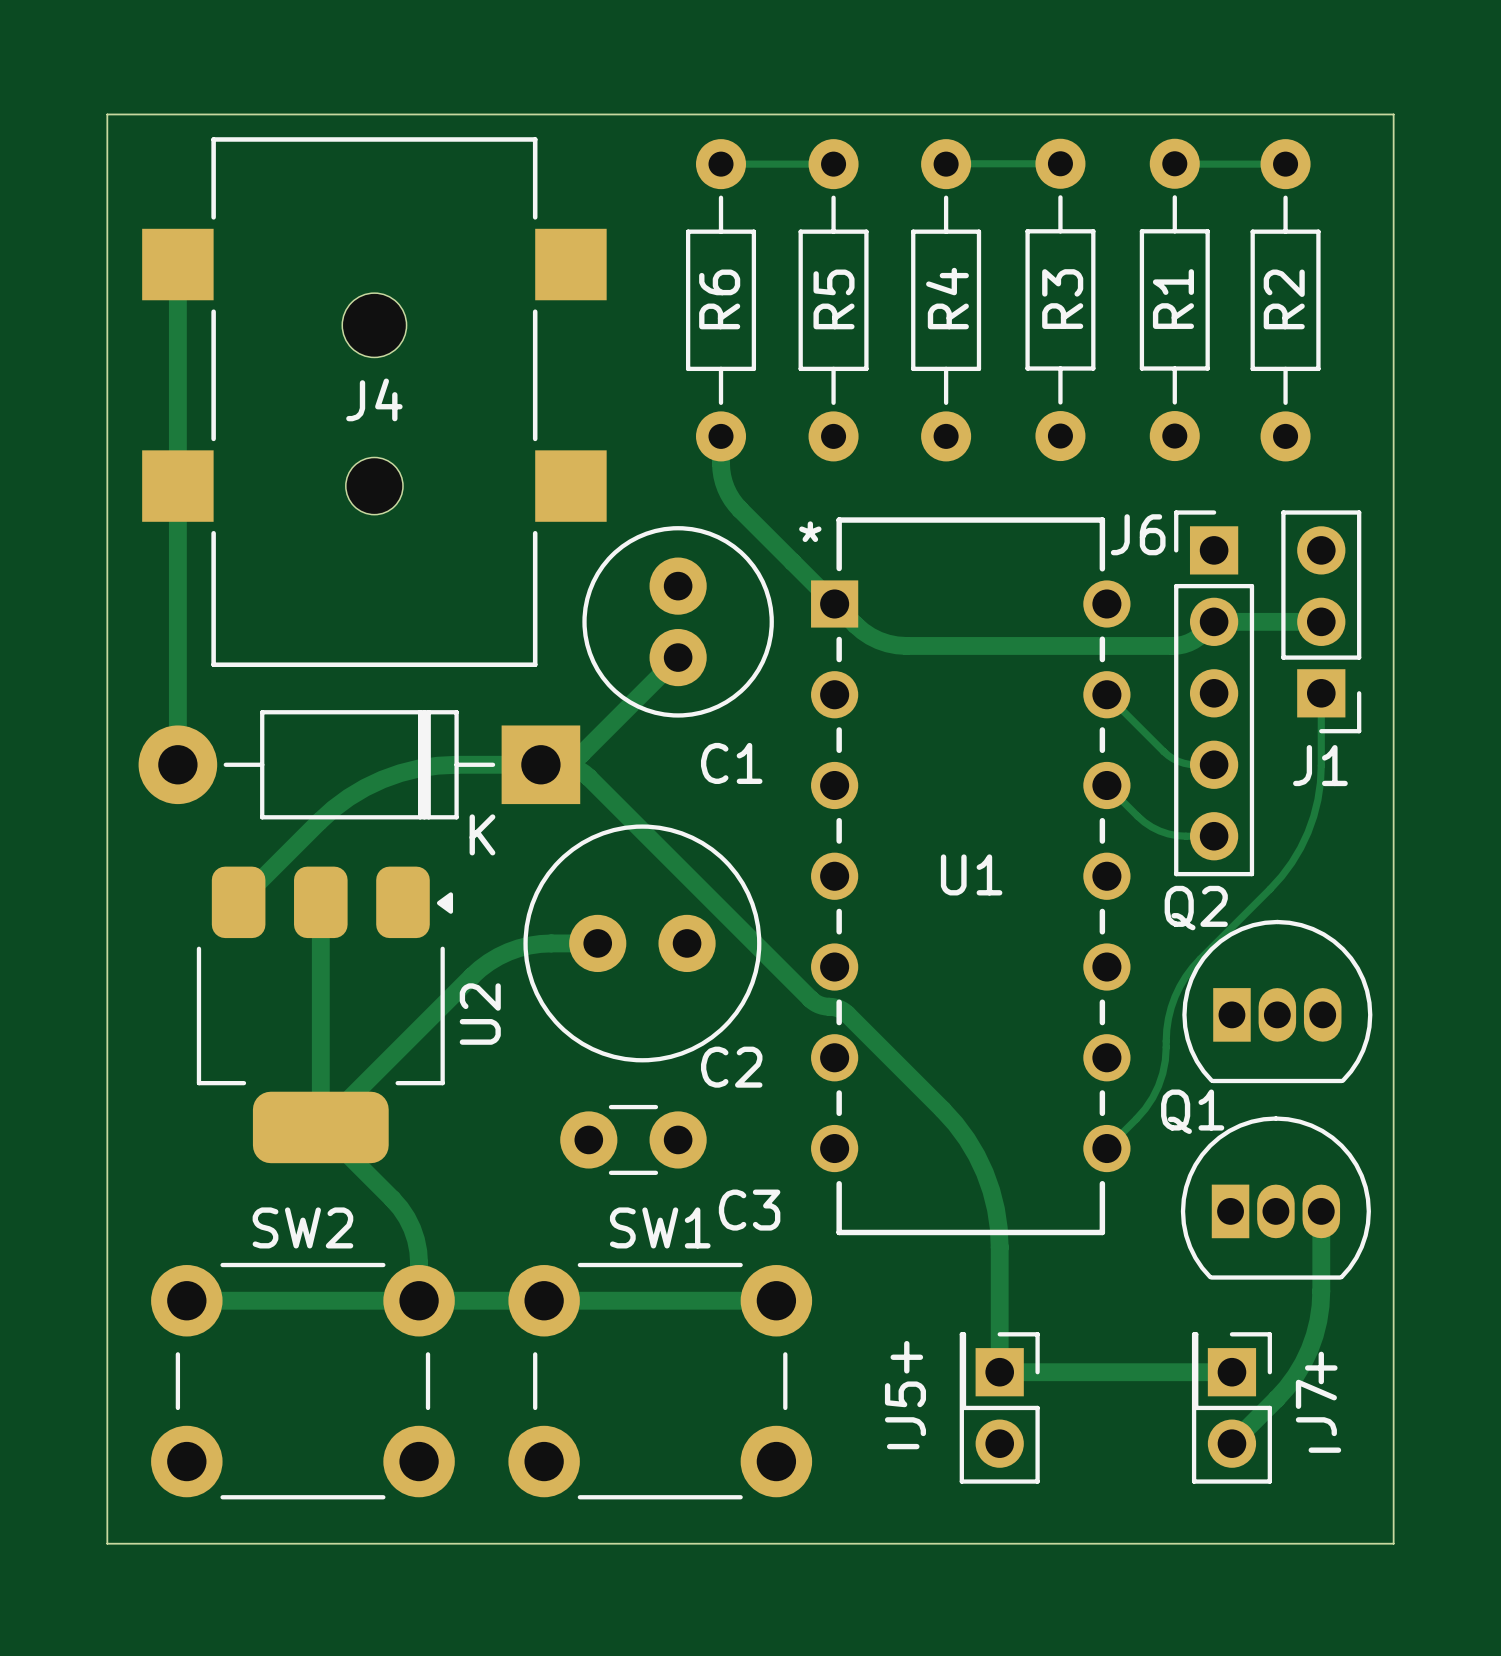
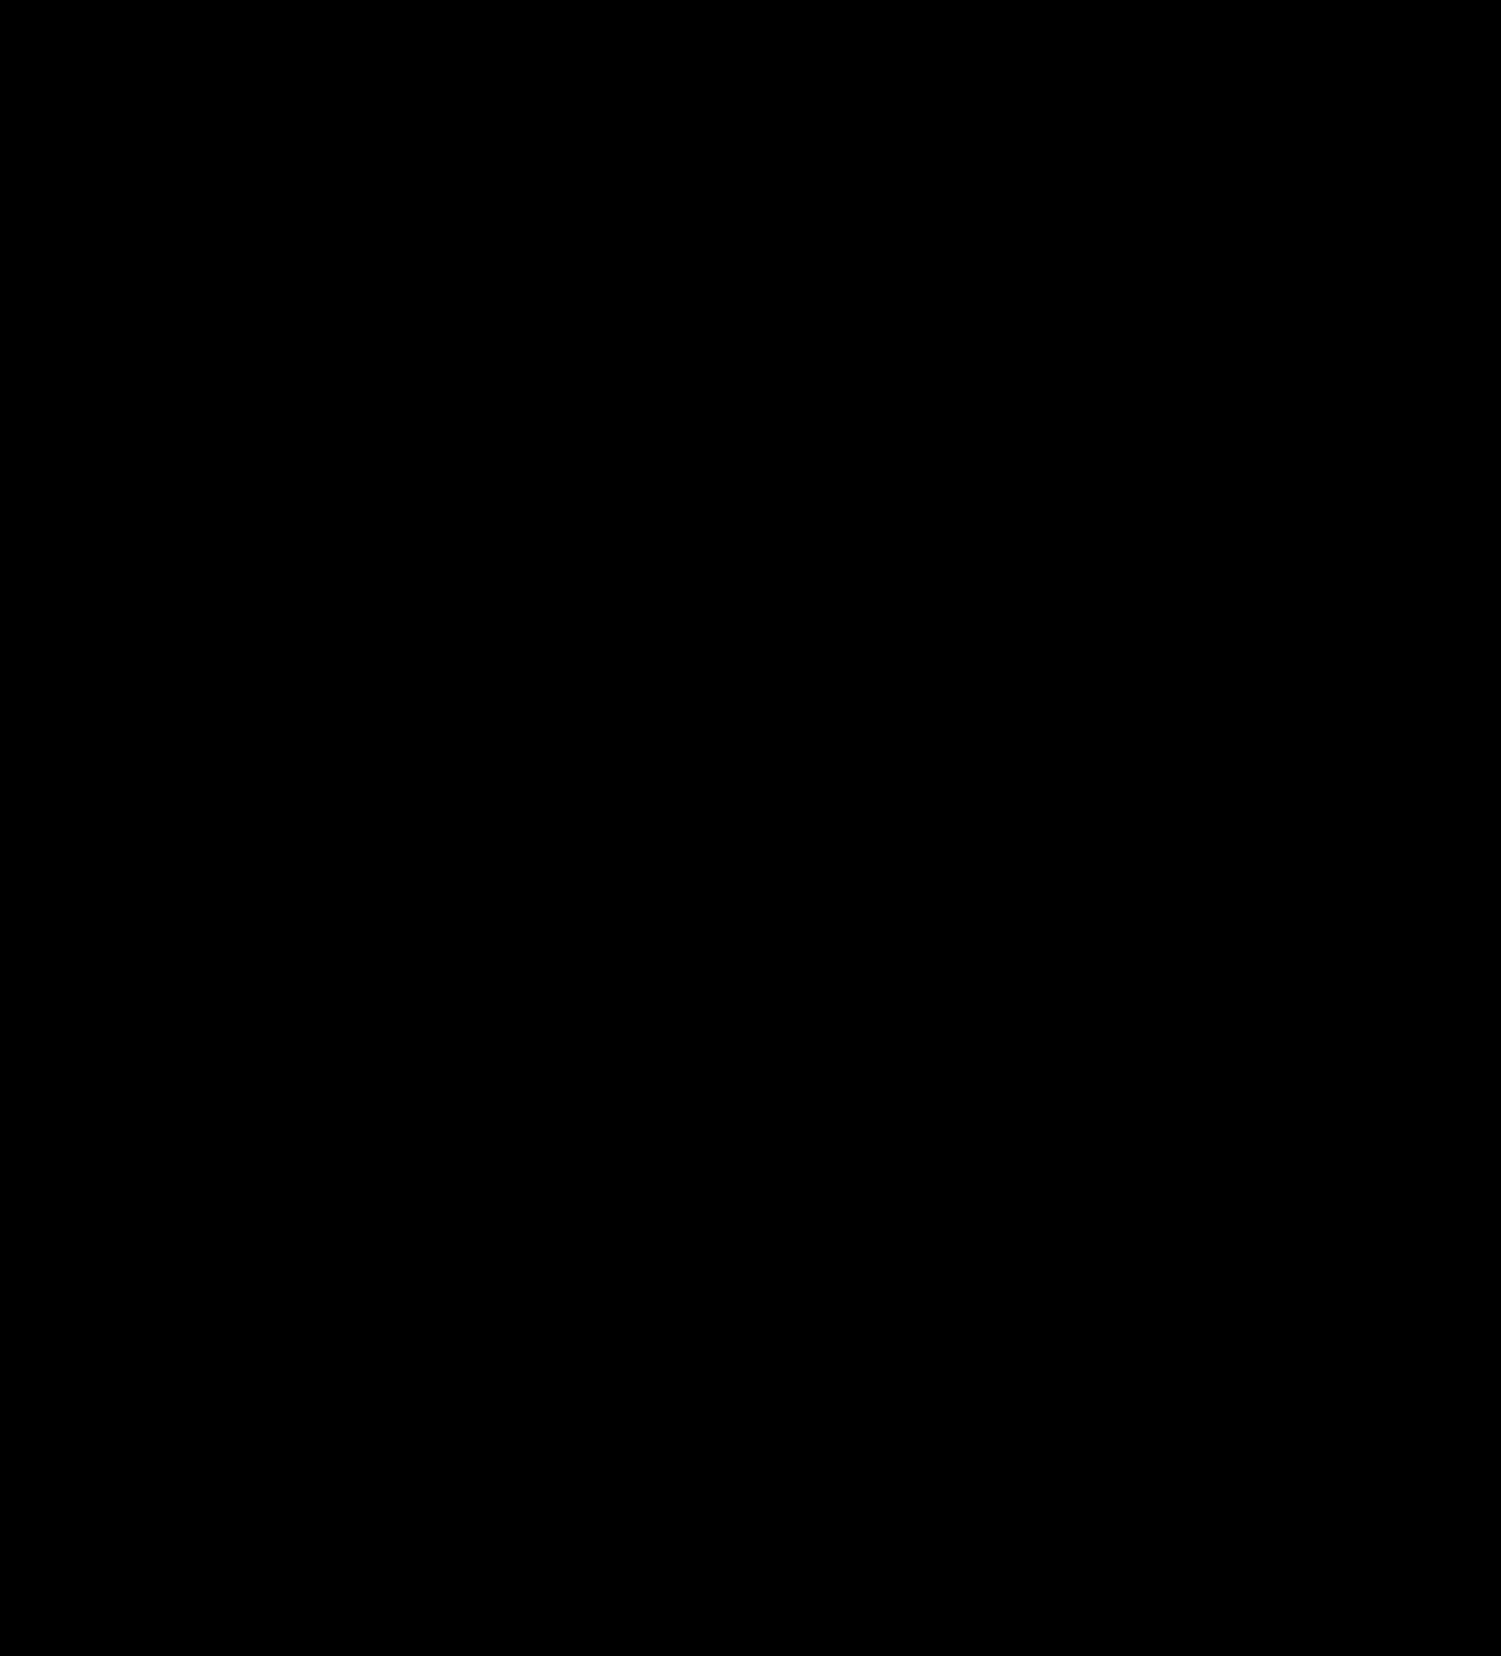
board edge: (107, 114) (1393, 114) (1393, 1543) (107, 1543) (107, 114) -> none
track: (1060, 163) (946, 163) -> none
track: (1174, 163) (1285, 164) -> none
track: (721, 164) (833, 164) -> none
track: (177, 257) (177, 764) -> none
R3: (1060, 299) -> none
R1: (1174, 299) -> none
R6: (721, 300) -> none
R5: (833, 300) -> none
R4: (946, 300) -> none
R2: (1285, 300) -> none
J4: (374, 402) -> none
track: (721, 436) (722, 476) (725, 488) (735, 504) (855, 624) (870, 636) (887, 643) (906, 645) (1172, 645) (1188, 642) (1211, 626) (1223, 622) (1321, 621) -> none
C1: (678, 621) -> none
J1: (1321, 621) -> none
track: (678, 657) (578, 756) (566, 763) (555, 764) -> none
J6: (1214, 693) -> none
track: (1321, 693) (1320, 782) (1313, 816) (1307, 832) (1300, 848) (1281, 876) (1200, 959) (1185, 976) (1175, 996) (1168, 1018) (1165, 1060) (1158, 1086) (1145, 1108) (1106, 1148) -> none
track: (1106, 694) (1173, 758) (1189, 764) (1214, 764) -> none
part: (359, 764) -> none
track: (1106, 785) (1144, 822) (1159, 831) (1176, 835) (1214, 836) -> none
U1: (970, 876) -> none
track: (238, 902) (333, 808) (365, 787) (382, 779) (418, 768) (437, 765) (558, 764) (574, 768) (588, 777) (810, 999) (822, 1005) (838, 1008) (847, 1014) (942, 1109) (966, 1139) (984, 1172) (991, 1190) (998, 1228) (999, 1372) (1231, 1372) -> none
track: (320, 902) (320, 1127) -> none
track: (597, 943) (529, 945) (508, 951) (488, 962) (471, 976) (320, 1127) -> none
C2: (642, 943) -> none
Q2: (1277, 1001) -> none
U2: (324, 1014) -> none
track: (320, 1127) (392, 1199) (406, 1217) (415, 1239) (418, 1251) (419, 1300) -> none
C3: (633, 1139) -> none
Q1: (1275, 1198) -> none
track: (1321, 1211) (1320, 1306) (1309, 1349) (1286, 1387) (1231, 1443) -> none
track: (186, 1300) (776, 1300) -> none
text: + (906, 1357) -> none
text: + (1321, 1367) -> none
SW2: (302, 1381) -> none
SW1: (660, 1381) -> none
J5: (999, 1407) -> none
J7: (1231, 1407) -> none
text: - (903, 1446) -> none
text: - (1324, 1450) -> none

